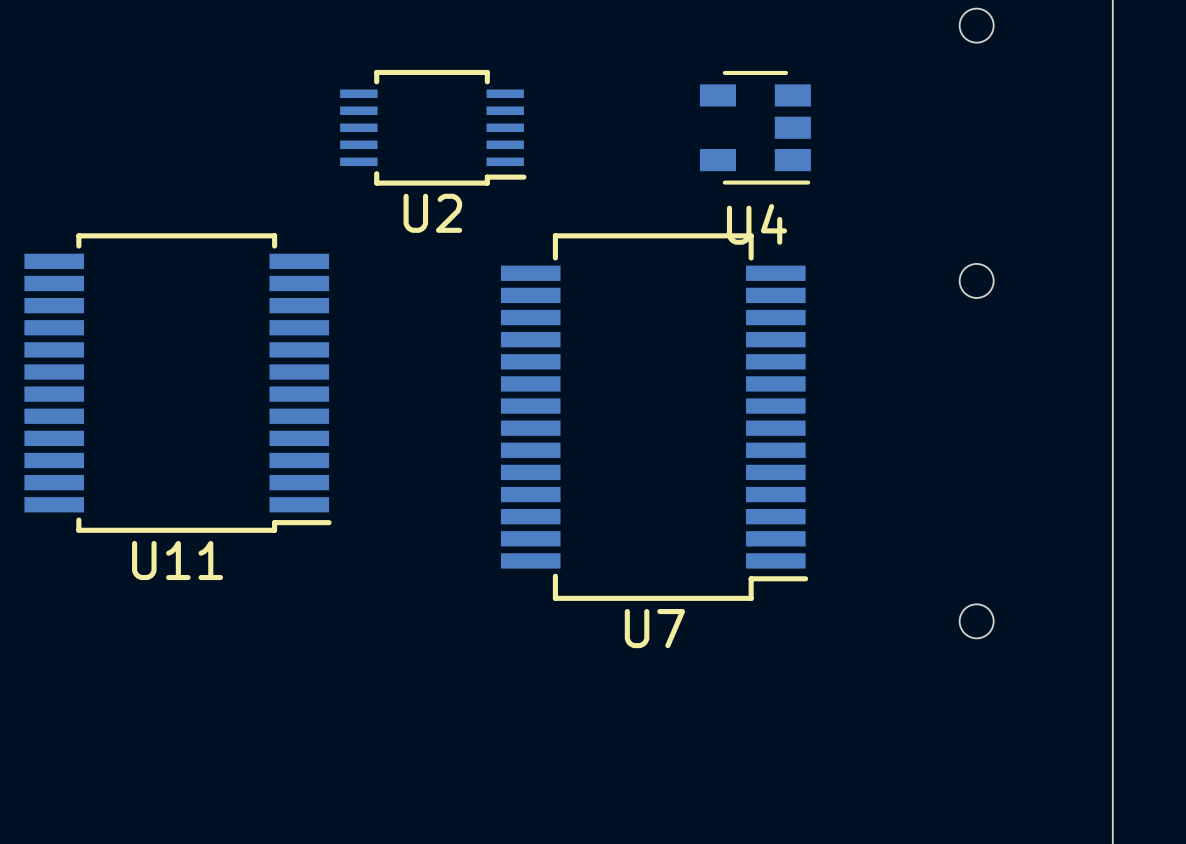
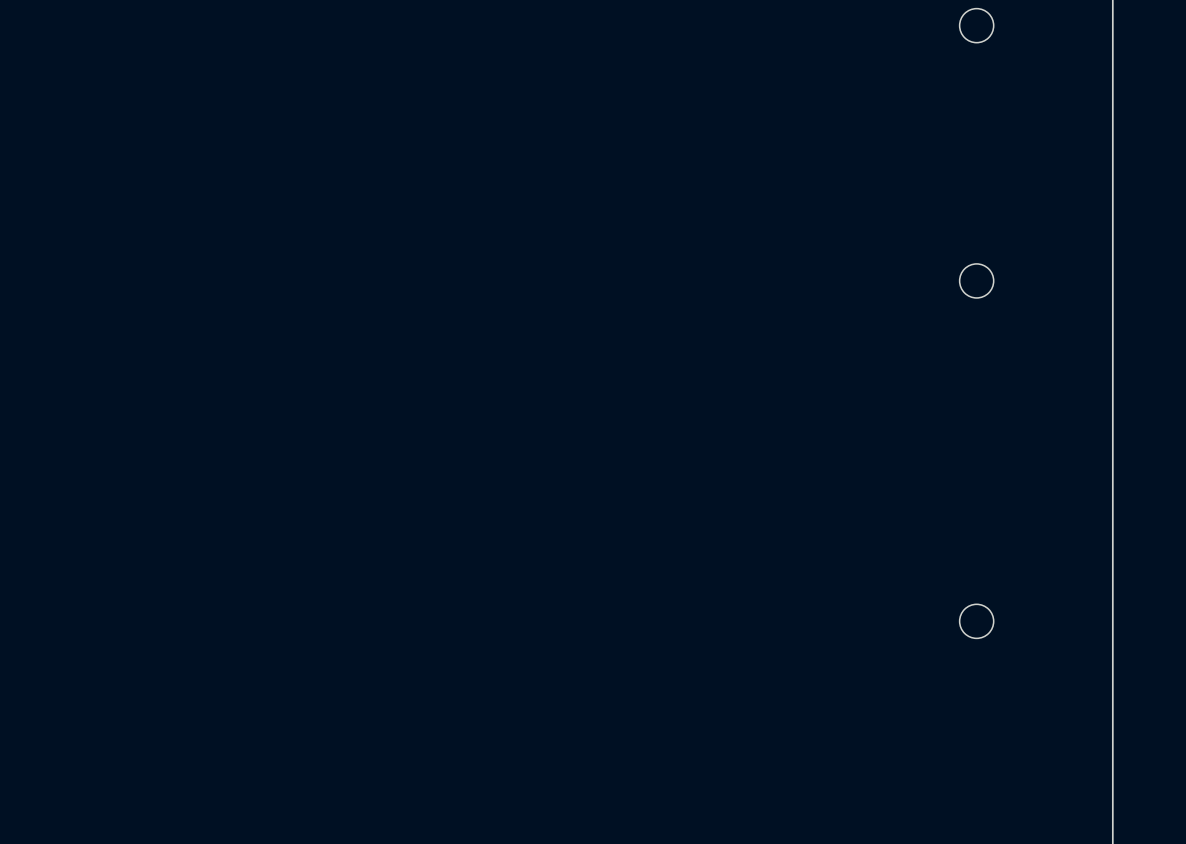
U2: (433, 127) -> none
U4: (755, 127) -> none
U11: (178, 383) -> none
U7: (654, 417) -> none

